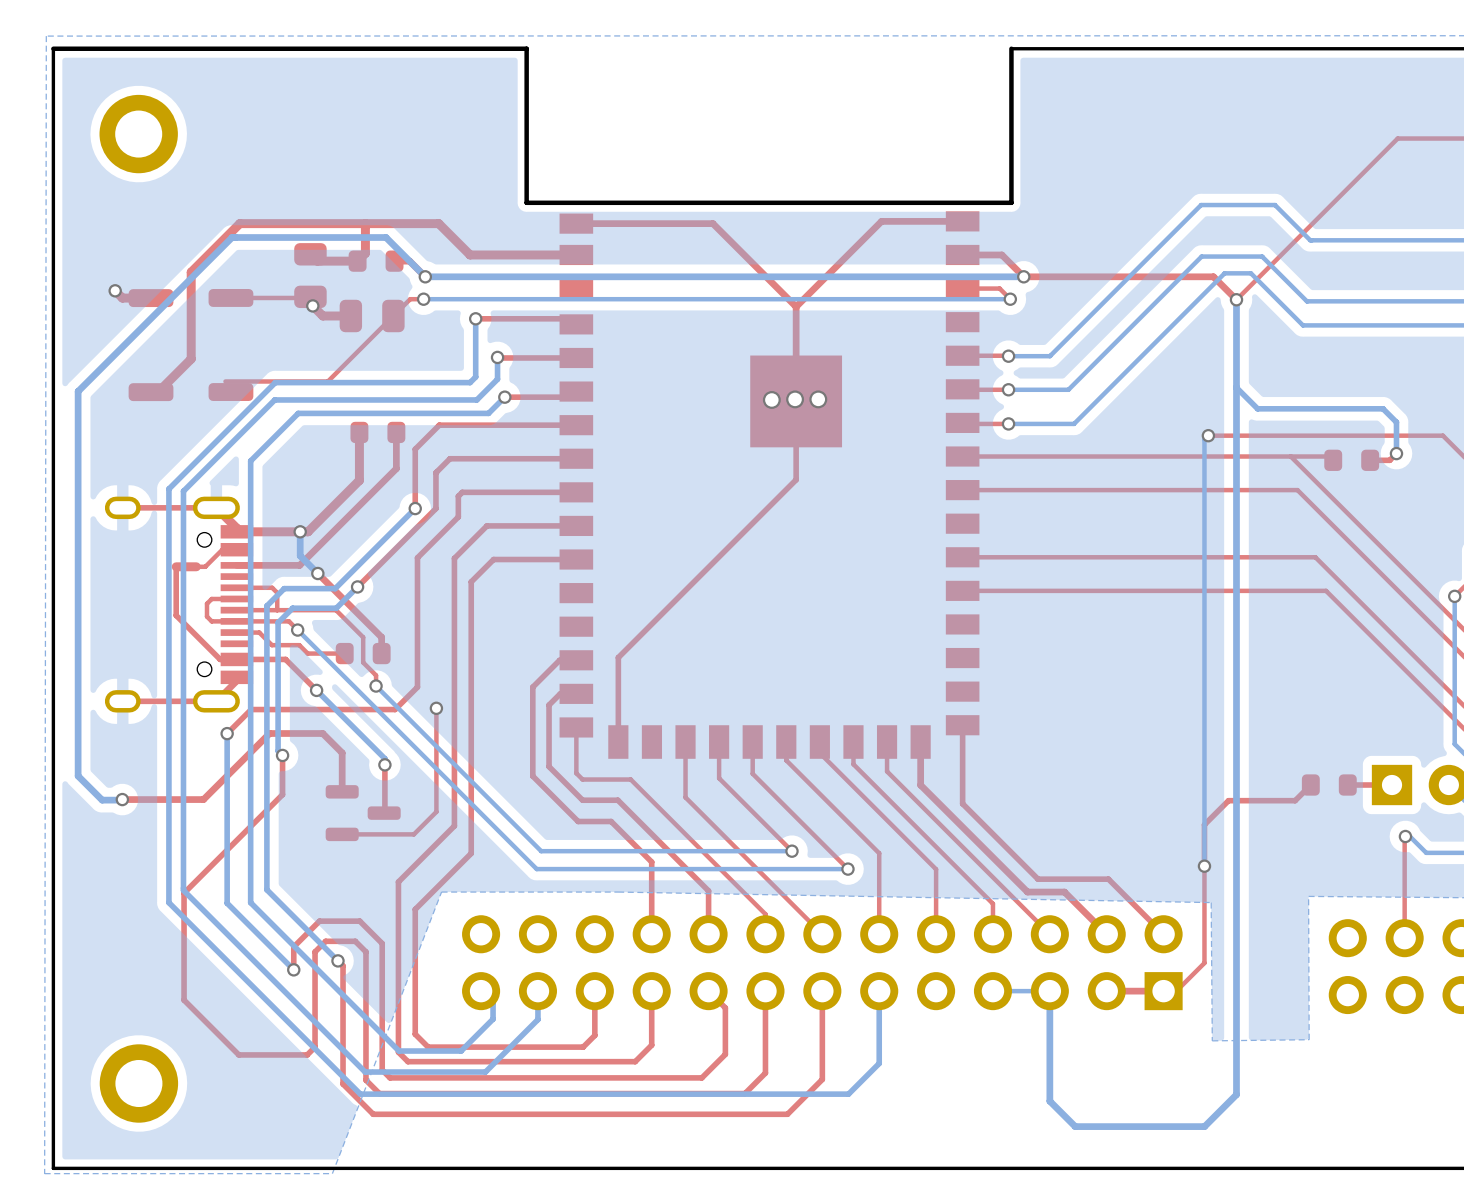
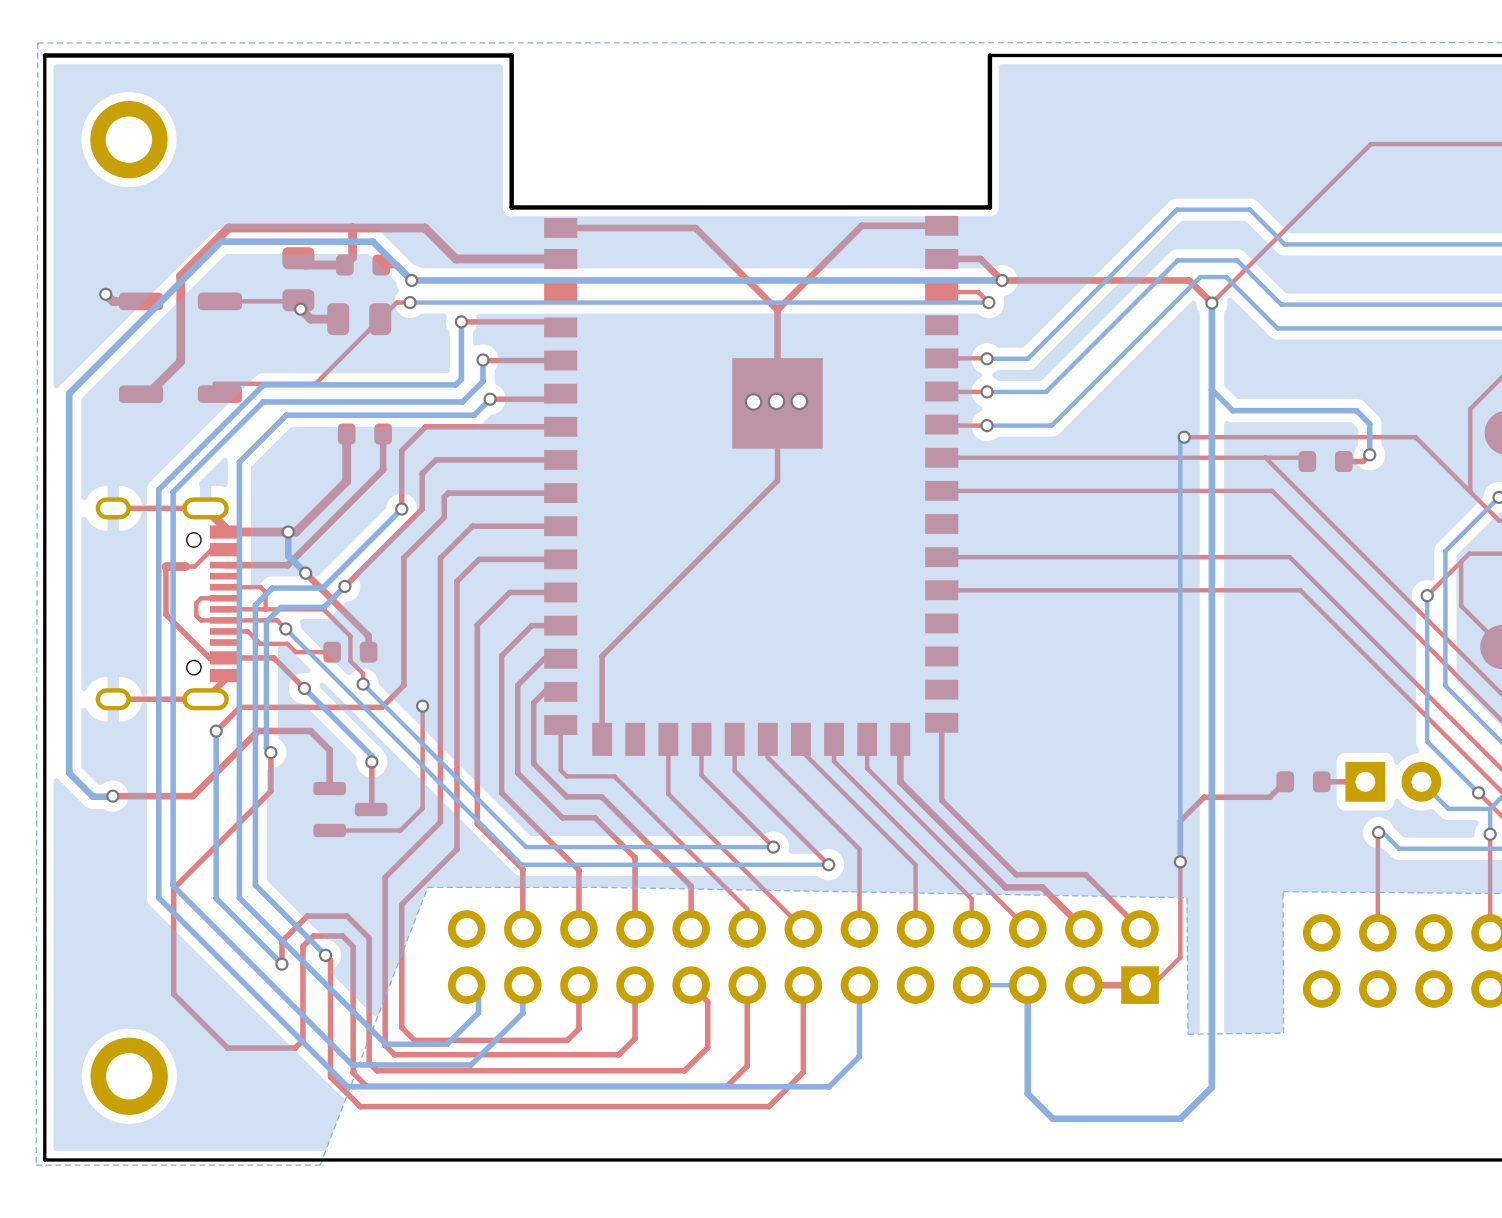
top track: none -> (560, 592) (509, 592) (477, 624) (477, 823) (522, 869) (522, 929)
top track: none -> (560, 625) (531, 625) (501, 655) (501, 792) (578, 870) (578, 929)

